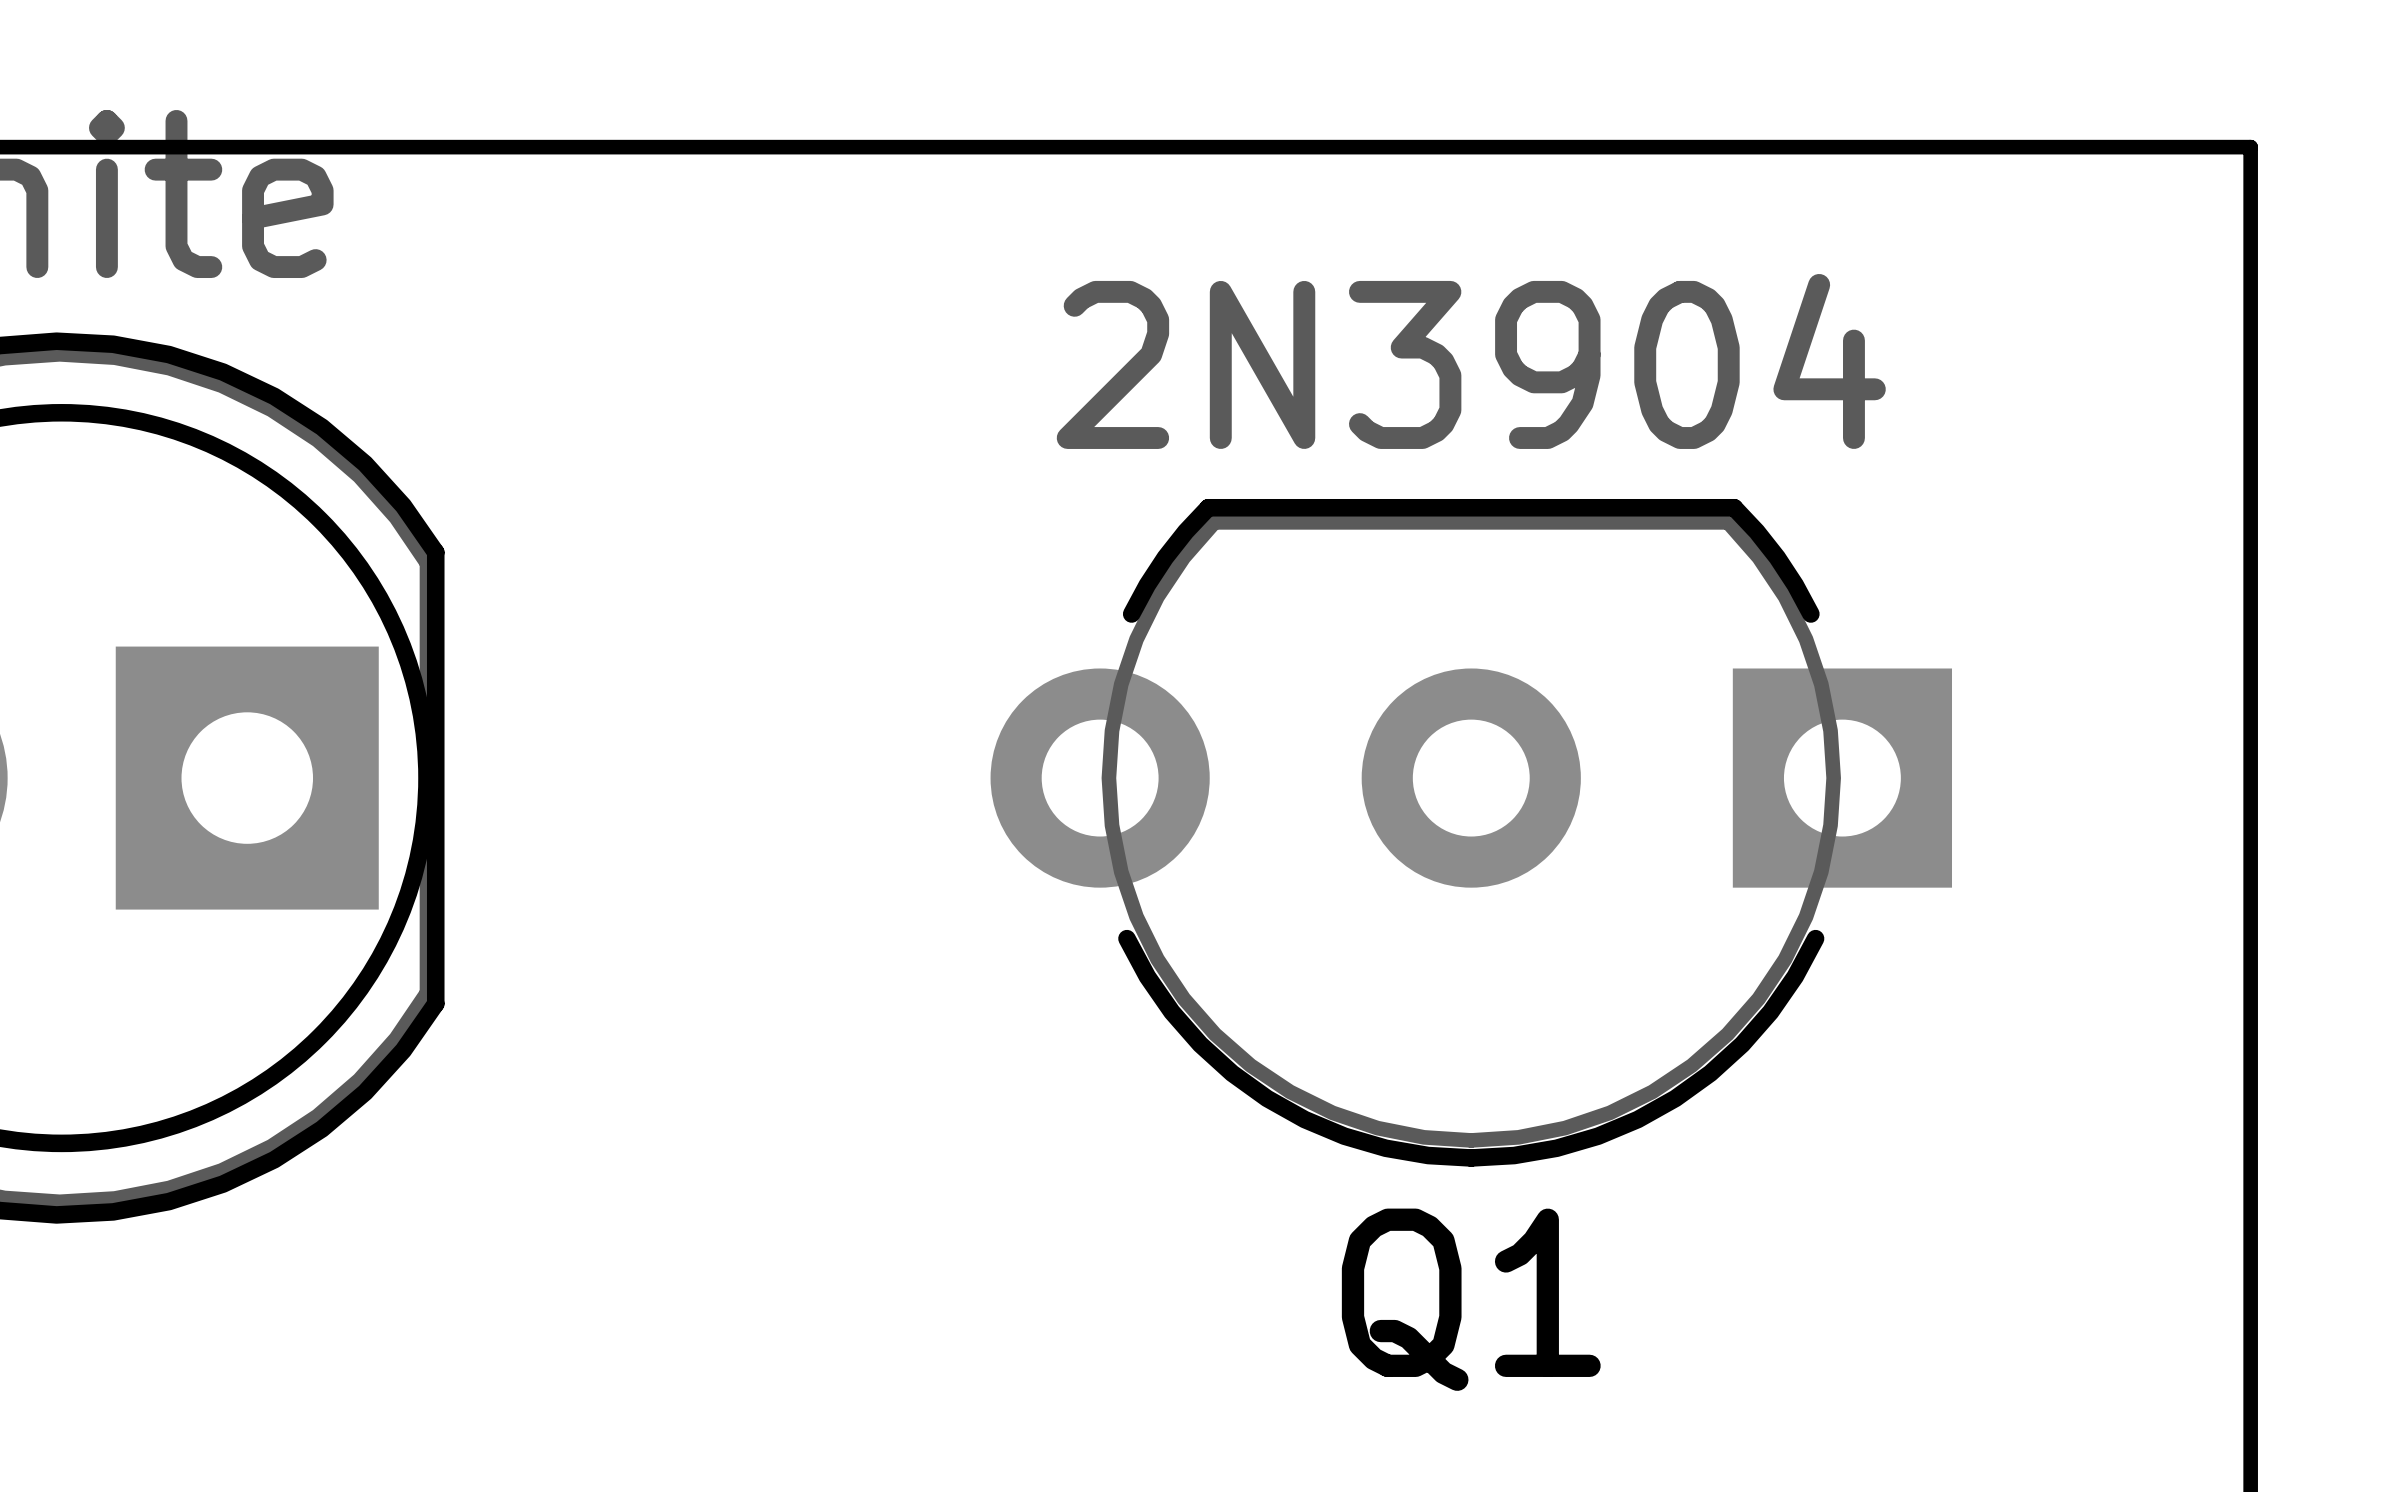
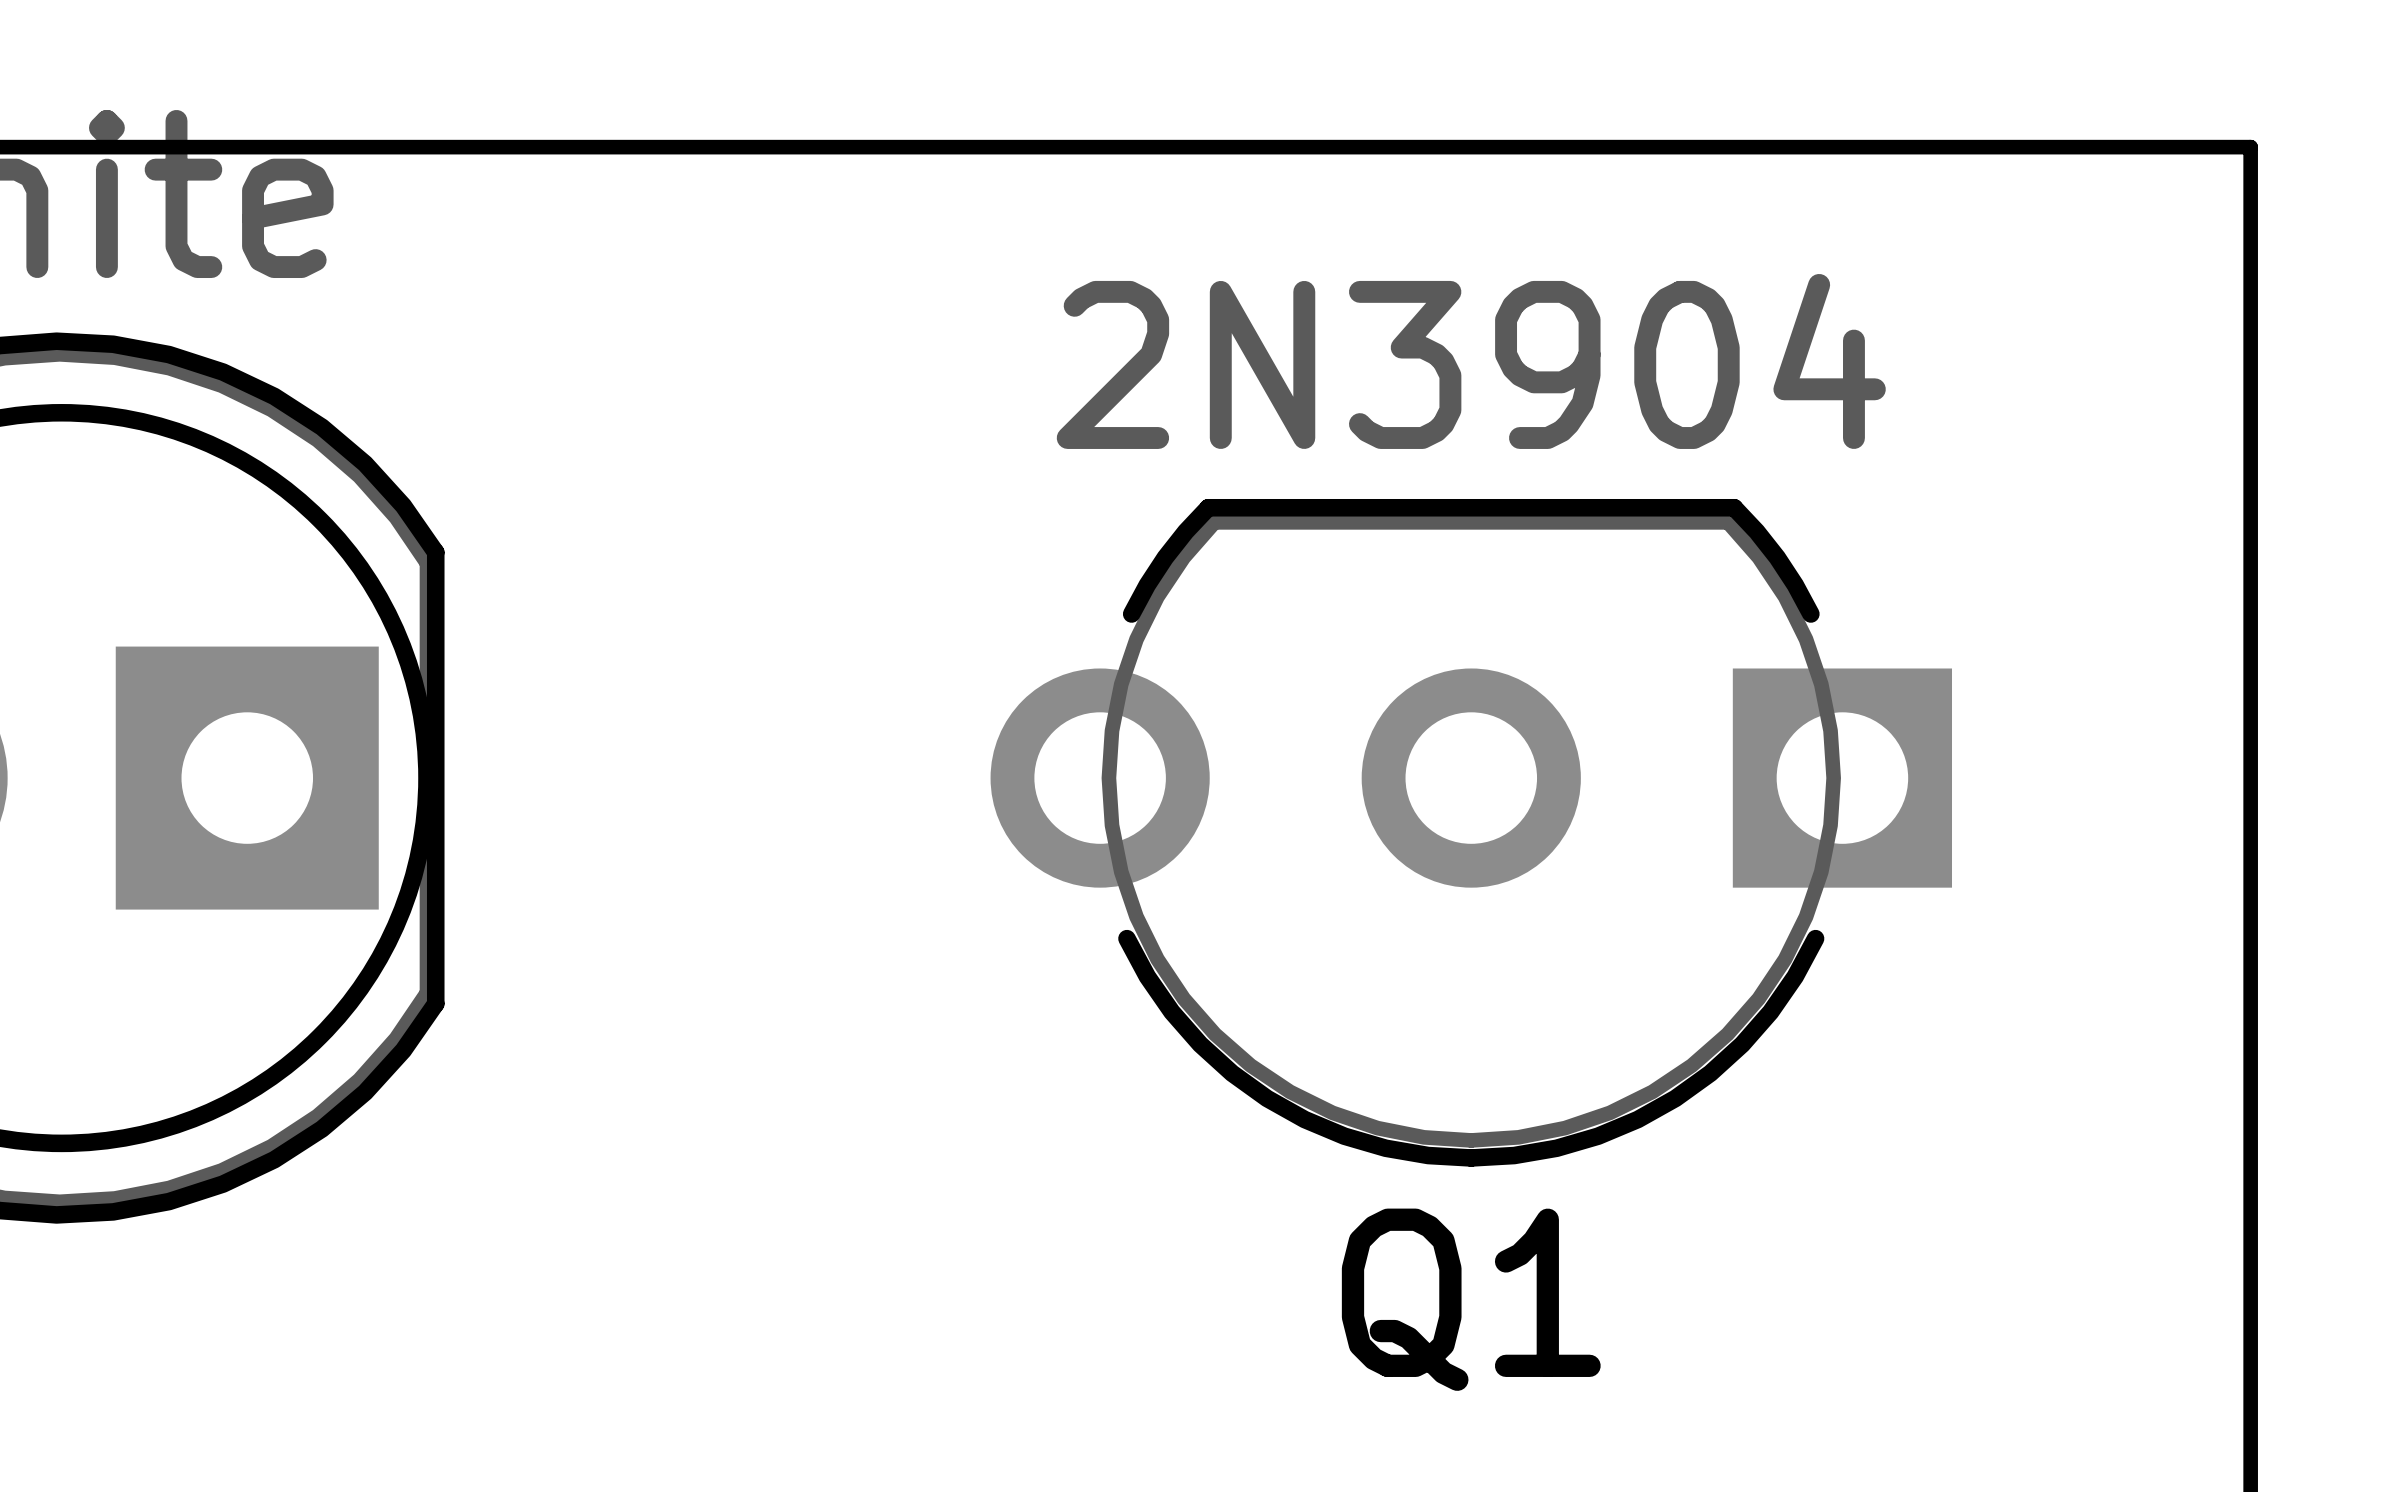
Q1 footprint: [990, 498, 1953, 1167] -> [990, 498, 1953, 1167]

